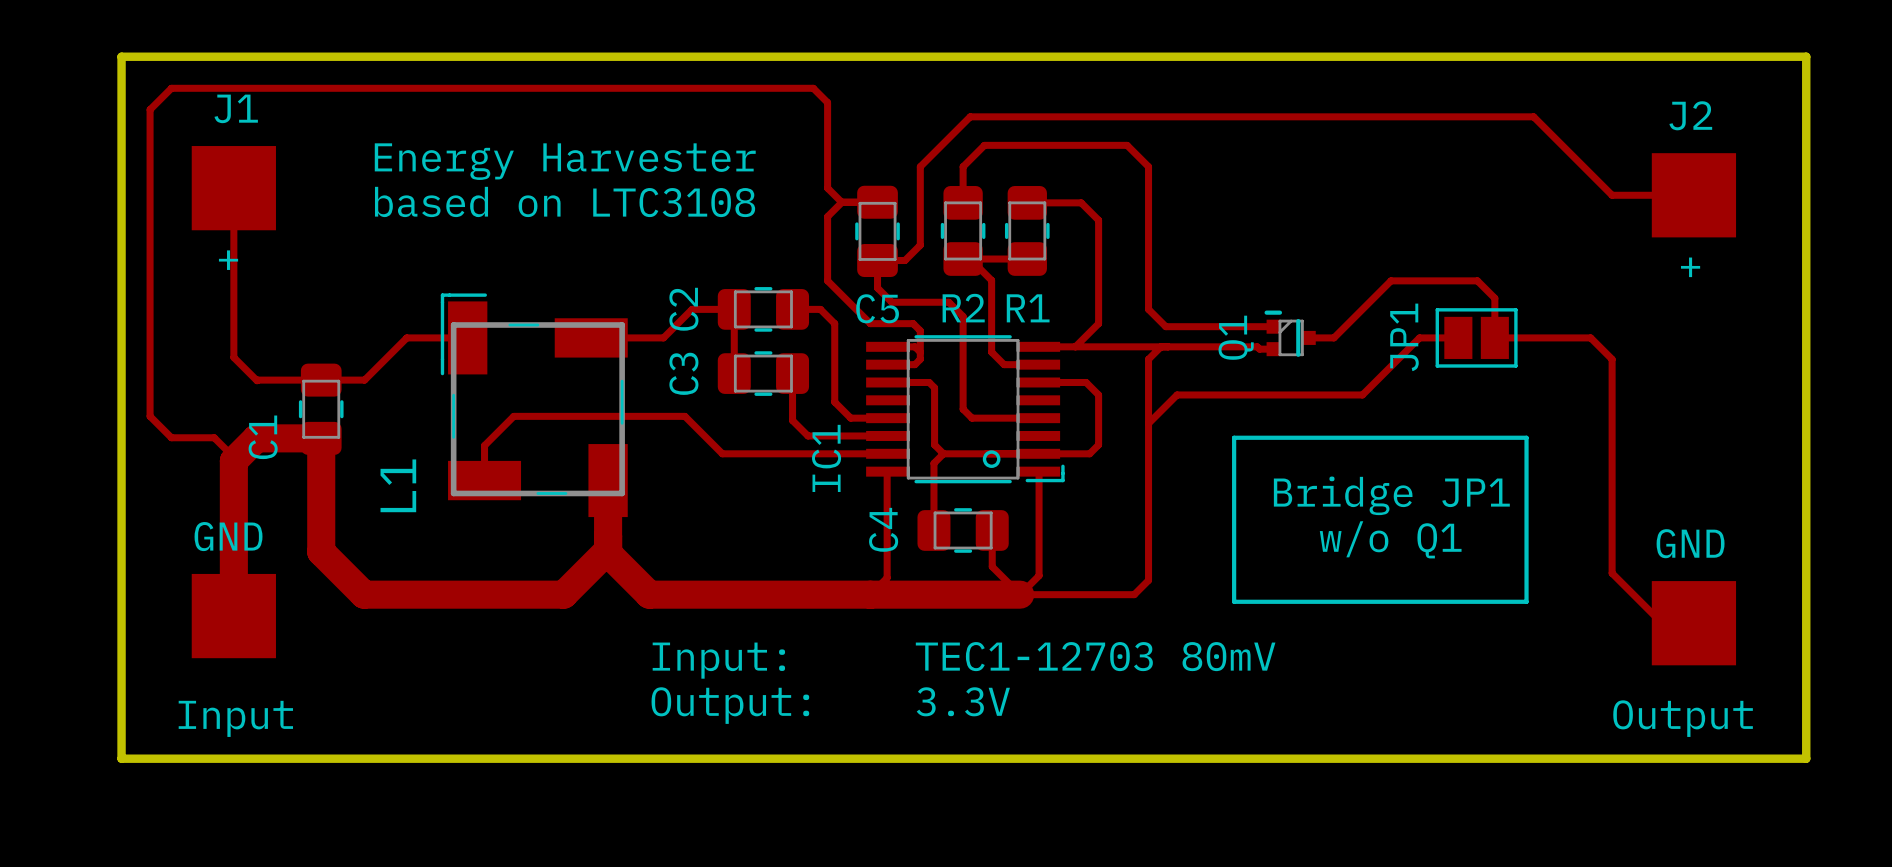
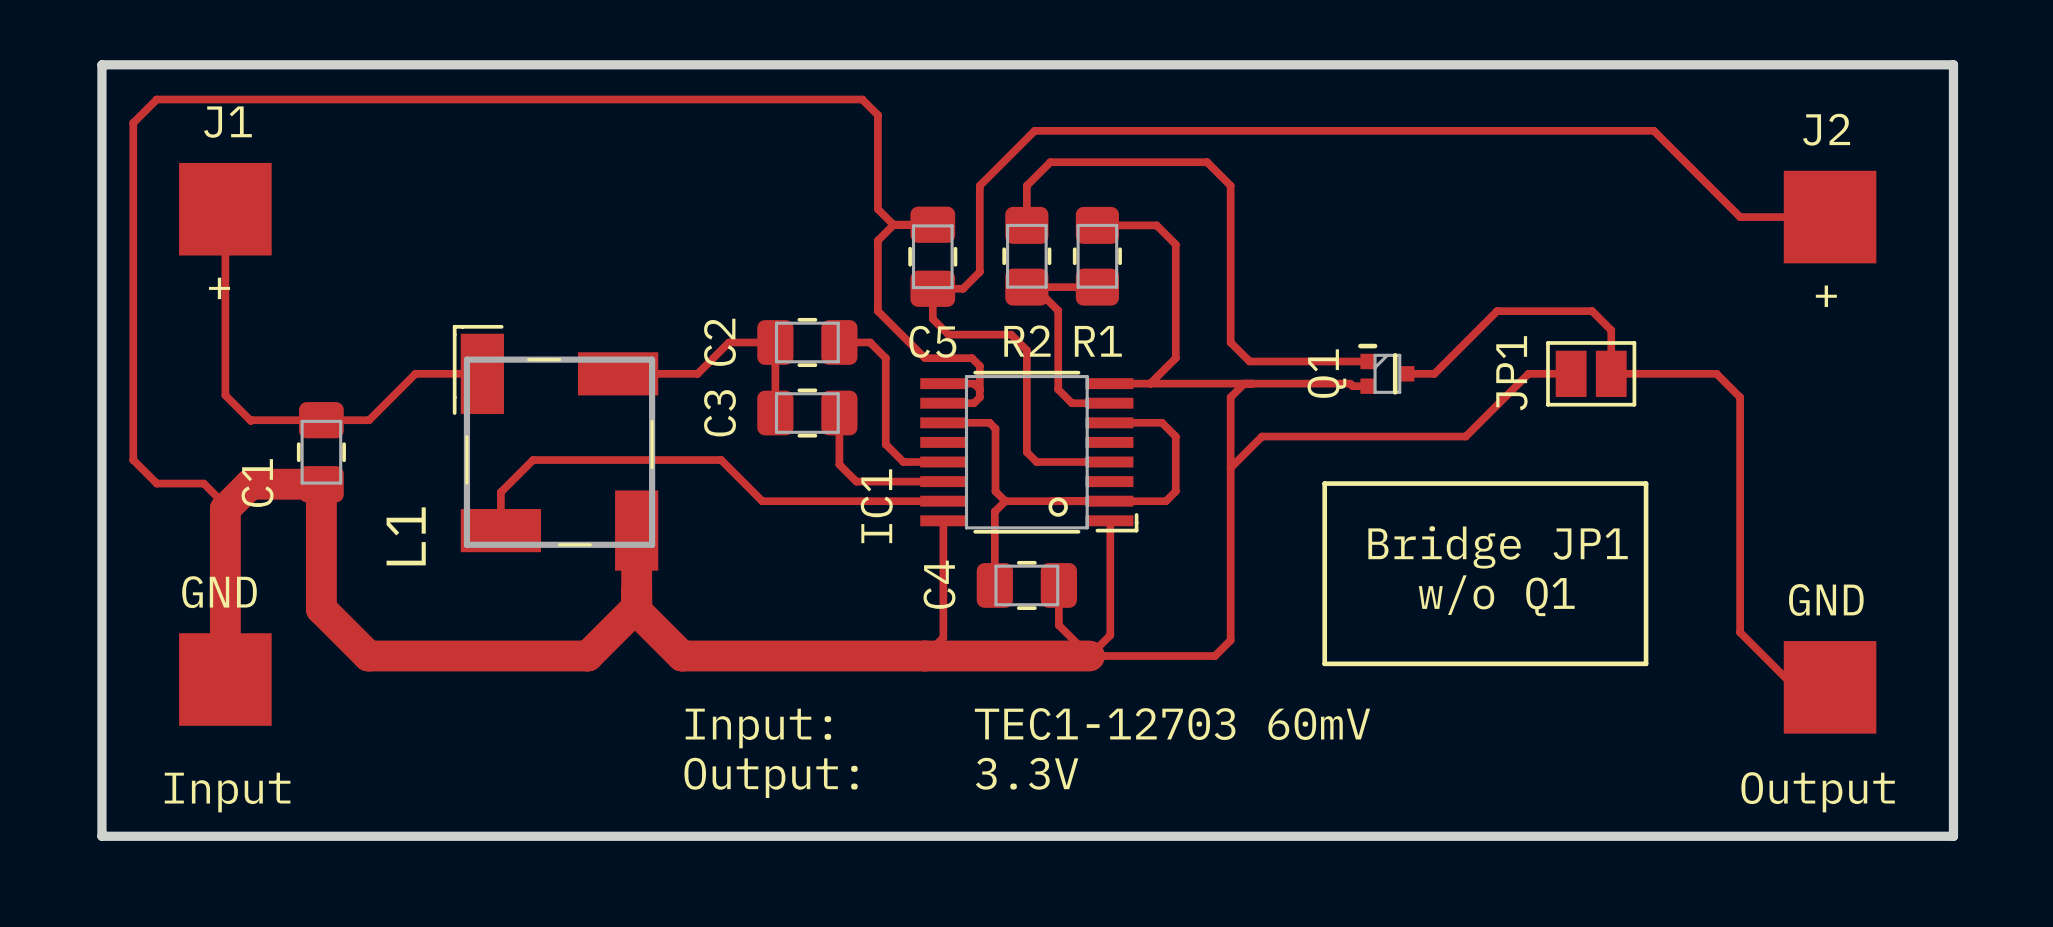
text: Energy Harvester (565, 161) -> none
text: based on LTC3108 (565, 201) -> none
text: Input: TEC1-12703 80mV (964, 660) -> Input: TEC1-12703 60mV (1027, 728)

